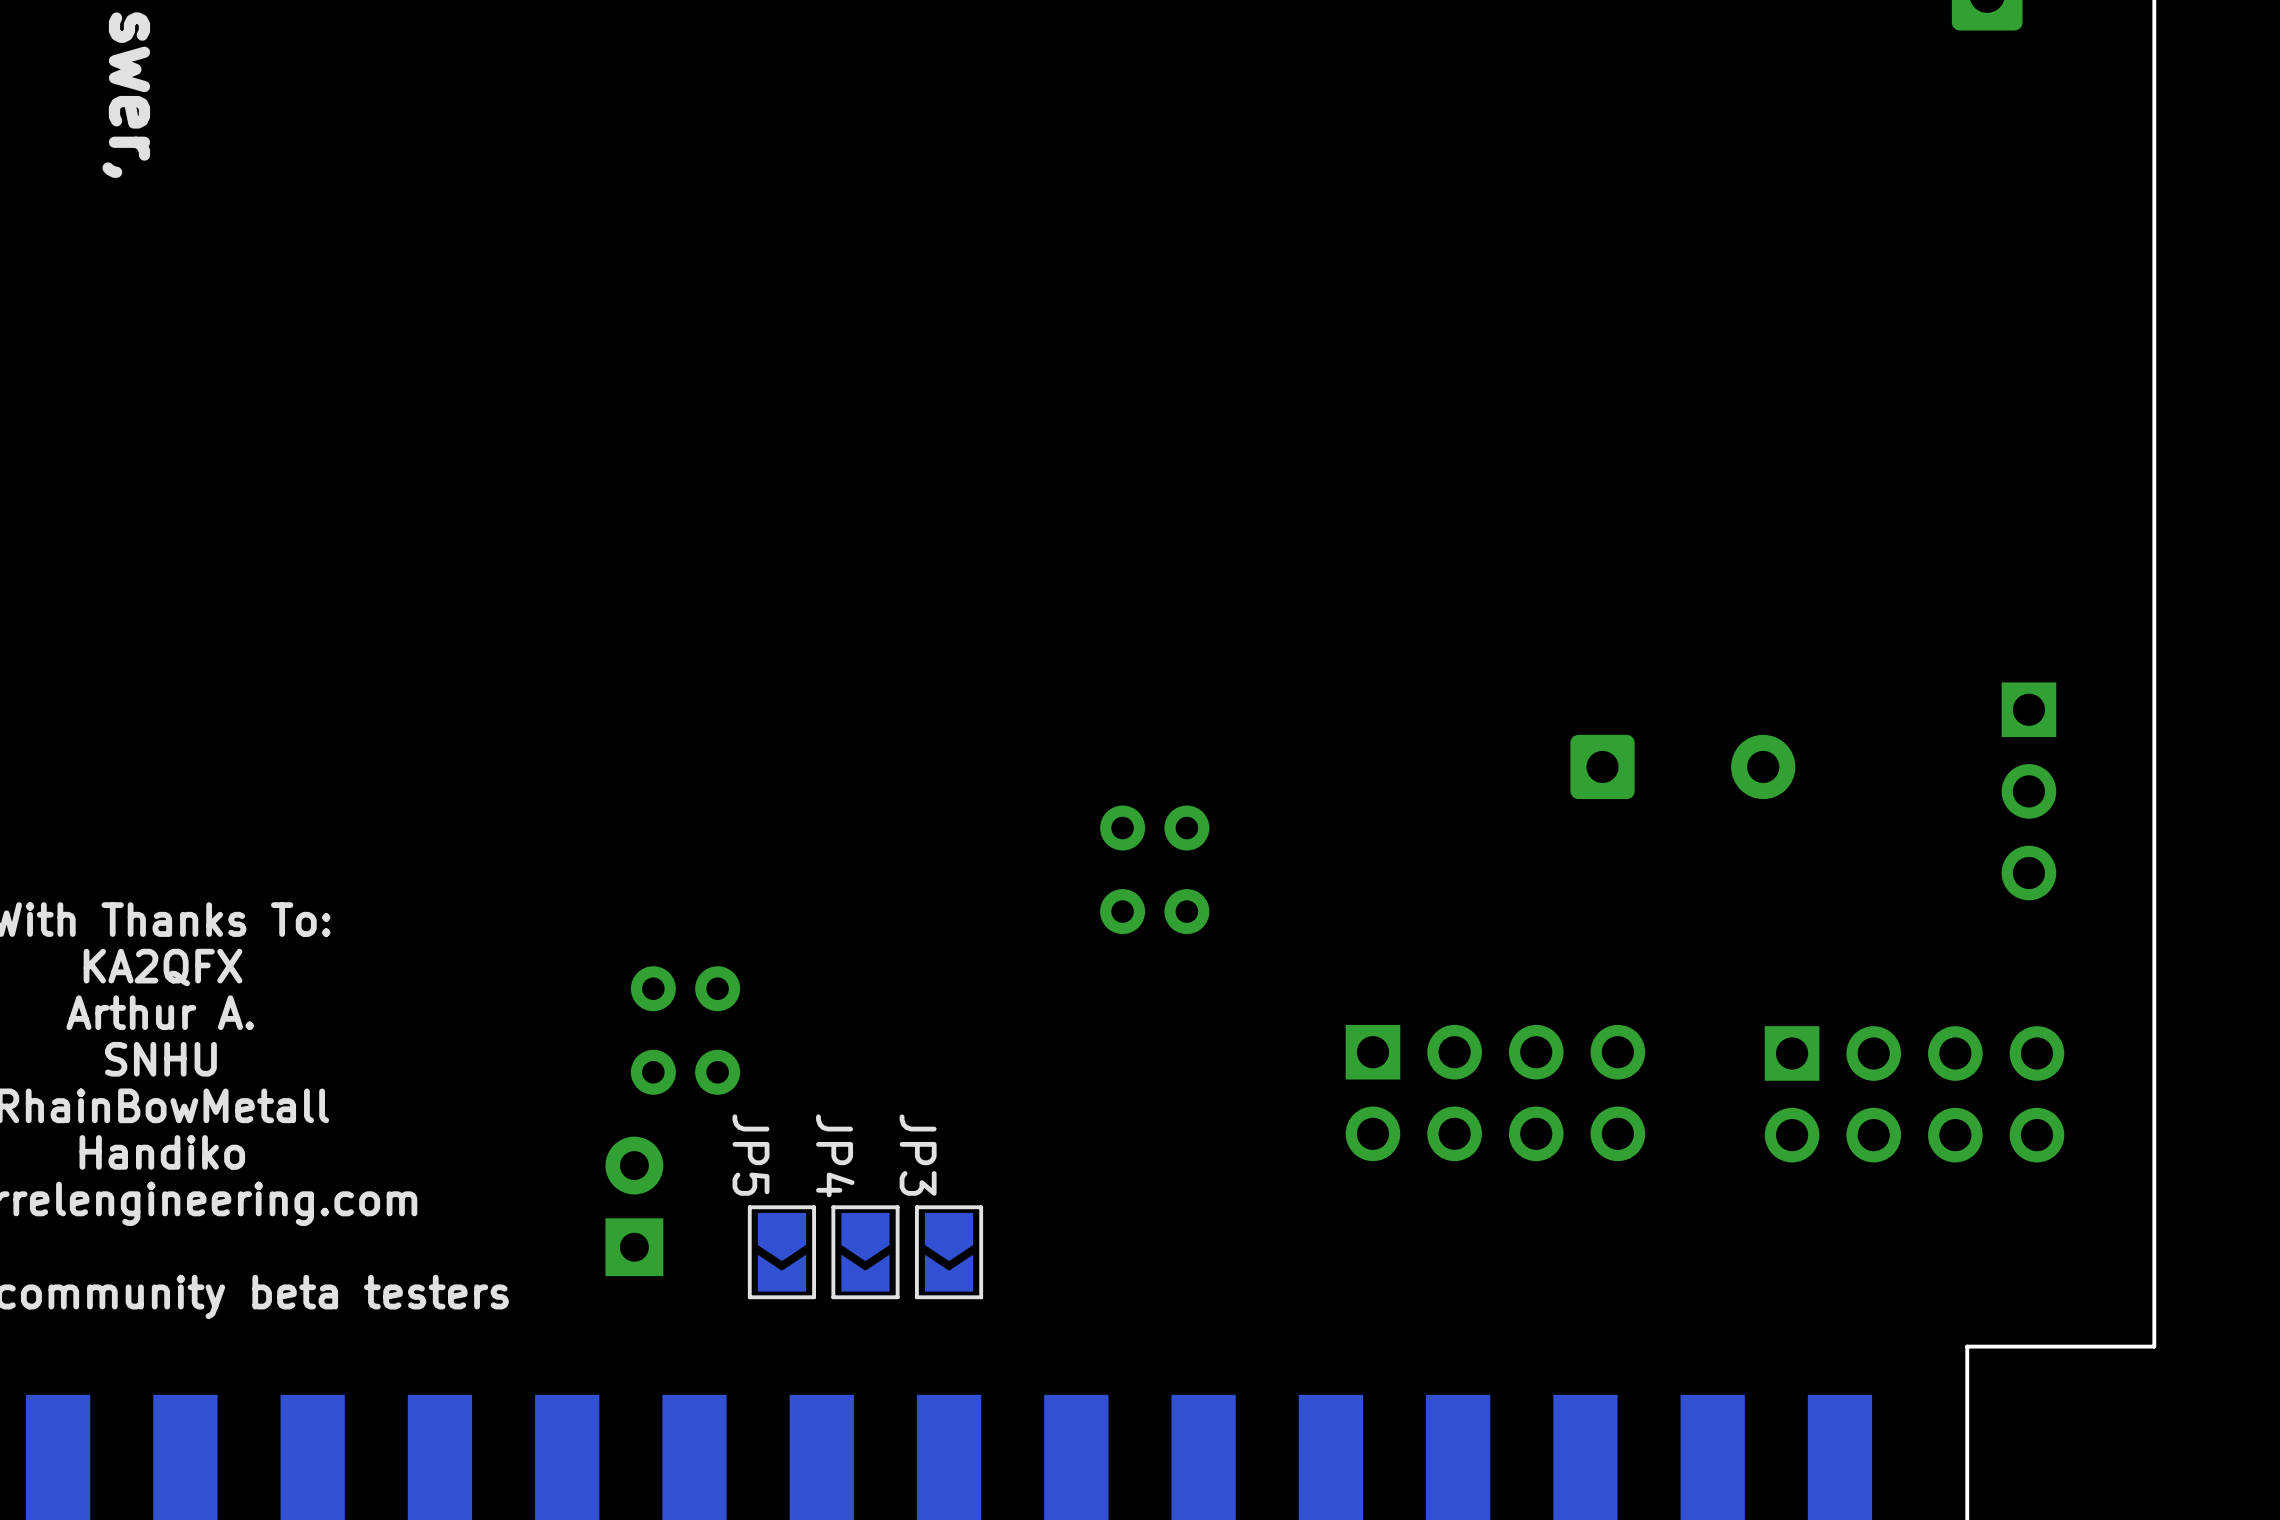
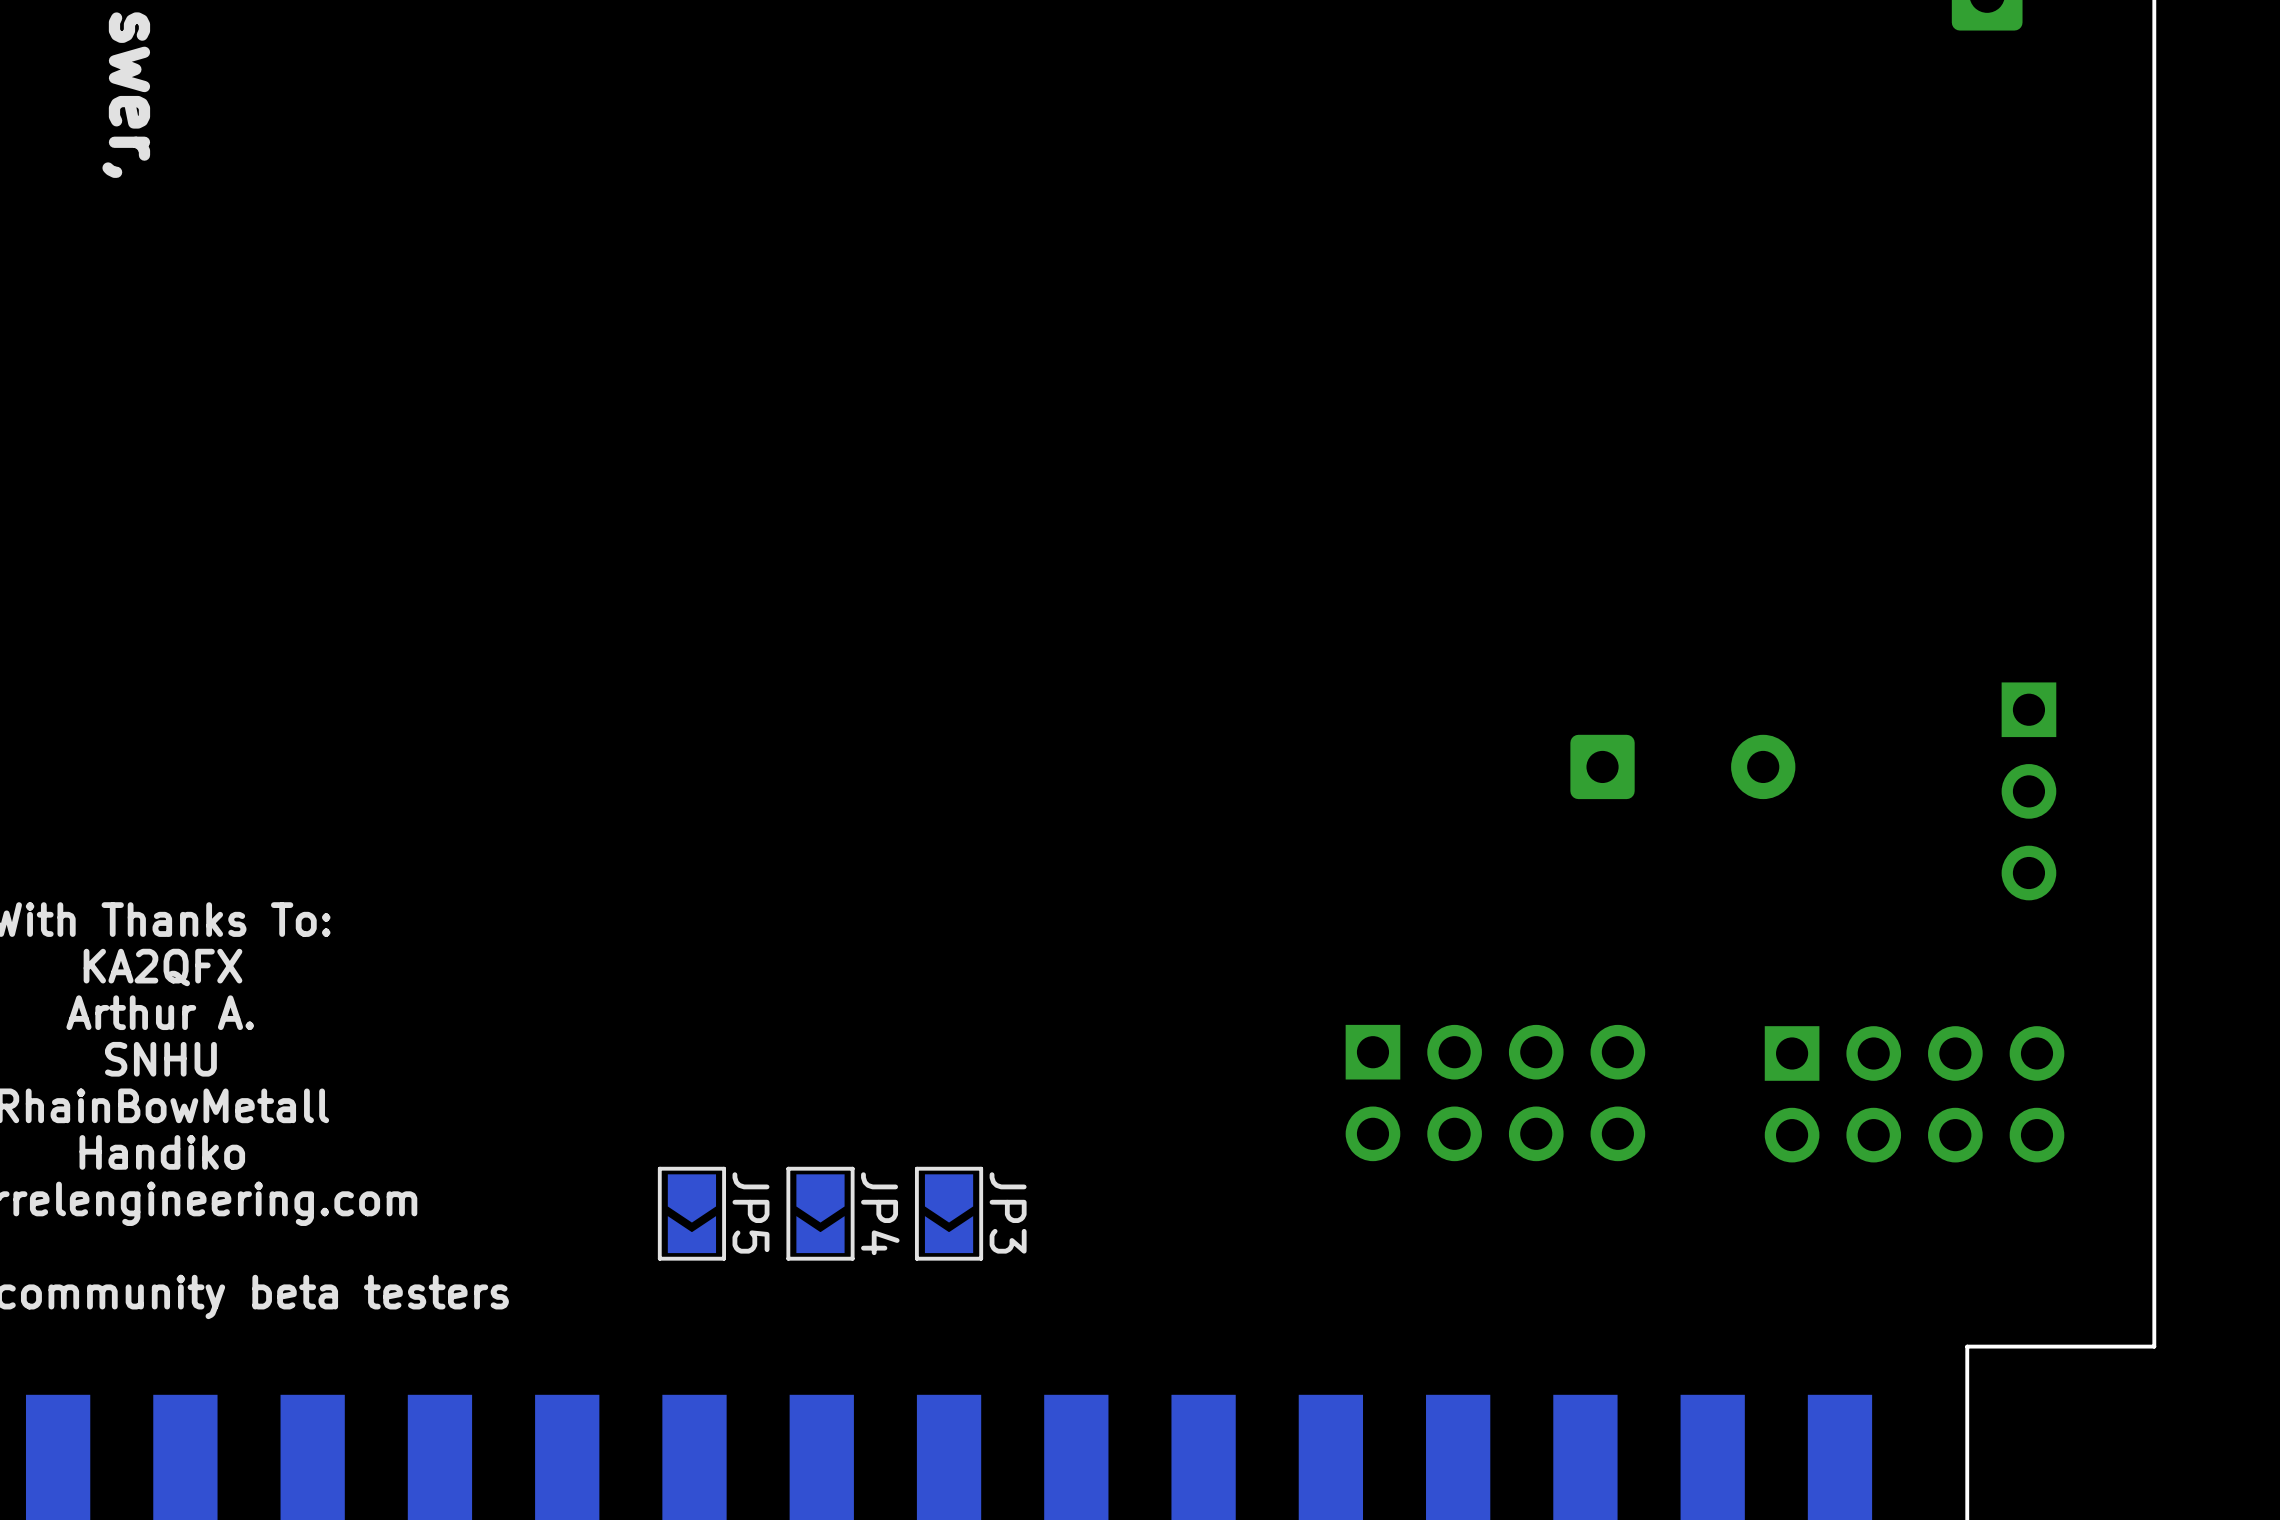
part: (1154, 828) -> none
part: (1154, 911) -> none
part: (685, 988) -> none
part: (685, 1072) -> none
JP5 name position: JP5 (750, 1155) -> JP5 (750, 1212)
JP4 name position: JP4 (835, 1155) -> JP4 (880, 1213)
JP3 name position: JP3 (918, 1155) -> JP3 (1008, 1212)
part: (634, 1206) -> none
JP5 position: (781, 1252) -> (691, 1213)
JP4 position: (865, 1252) -> (820, 1213)
JP3 position: (949, 1252) -> (949, 1213)

